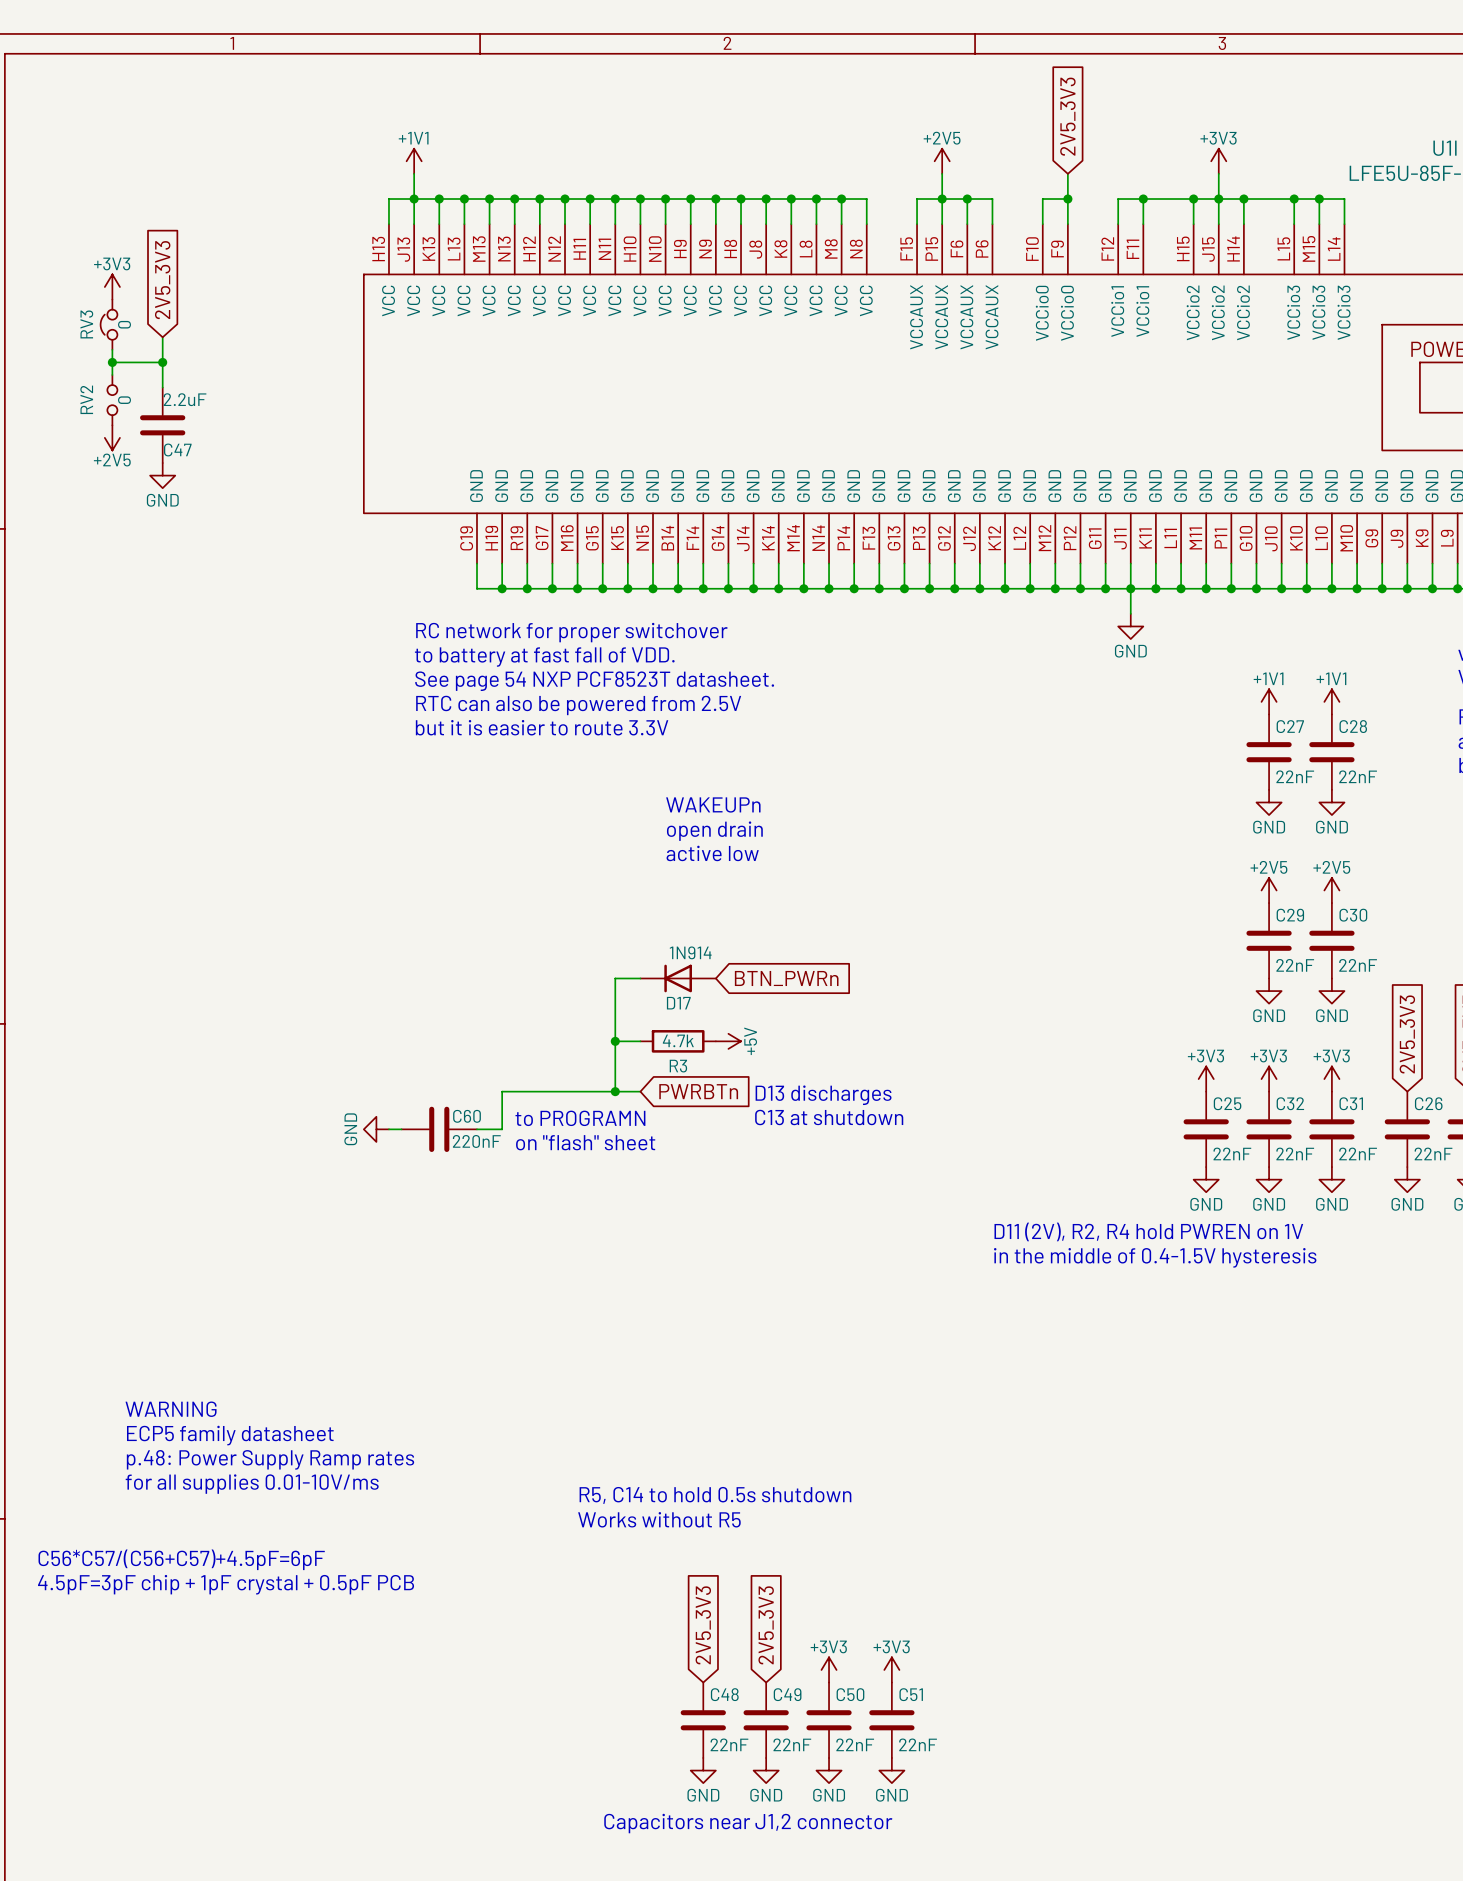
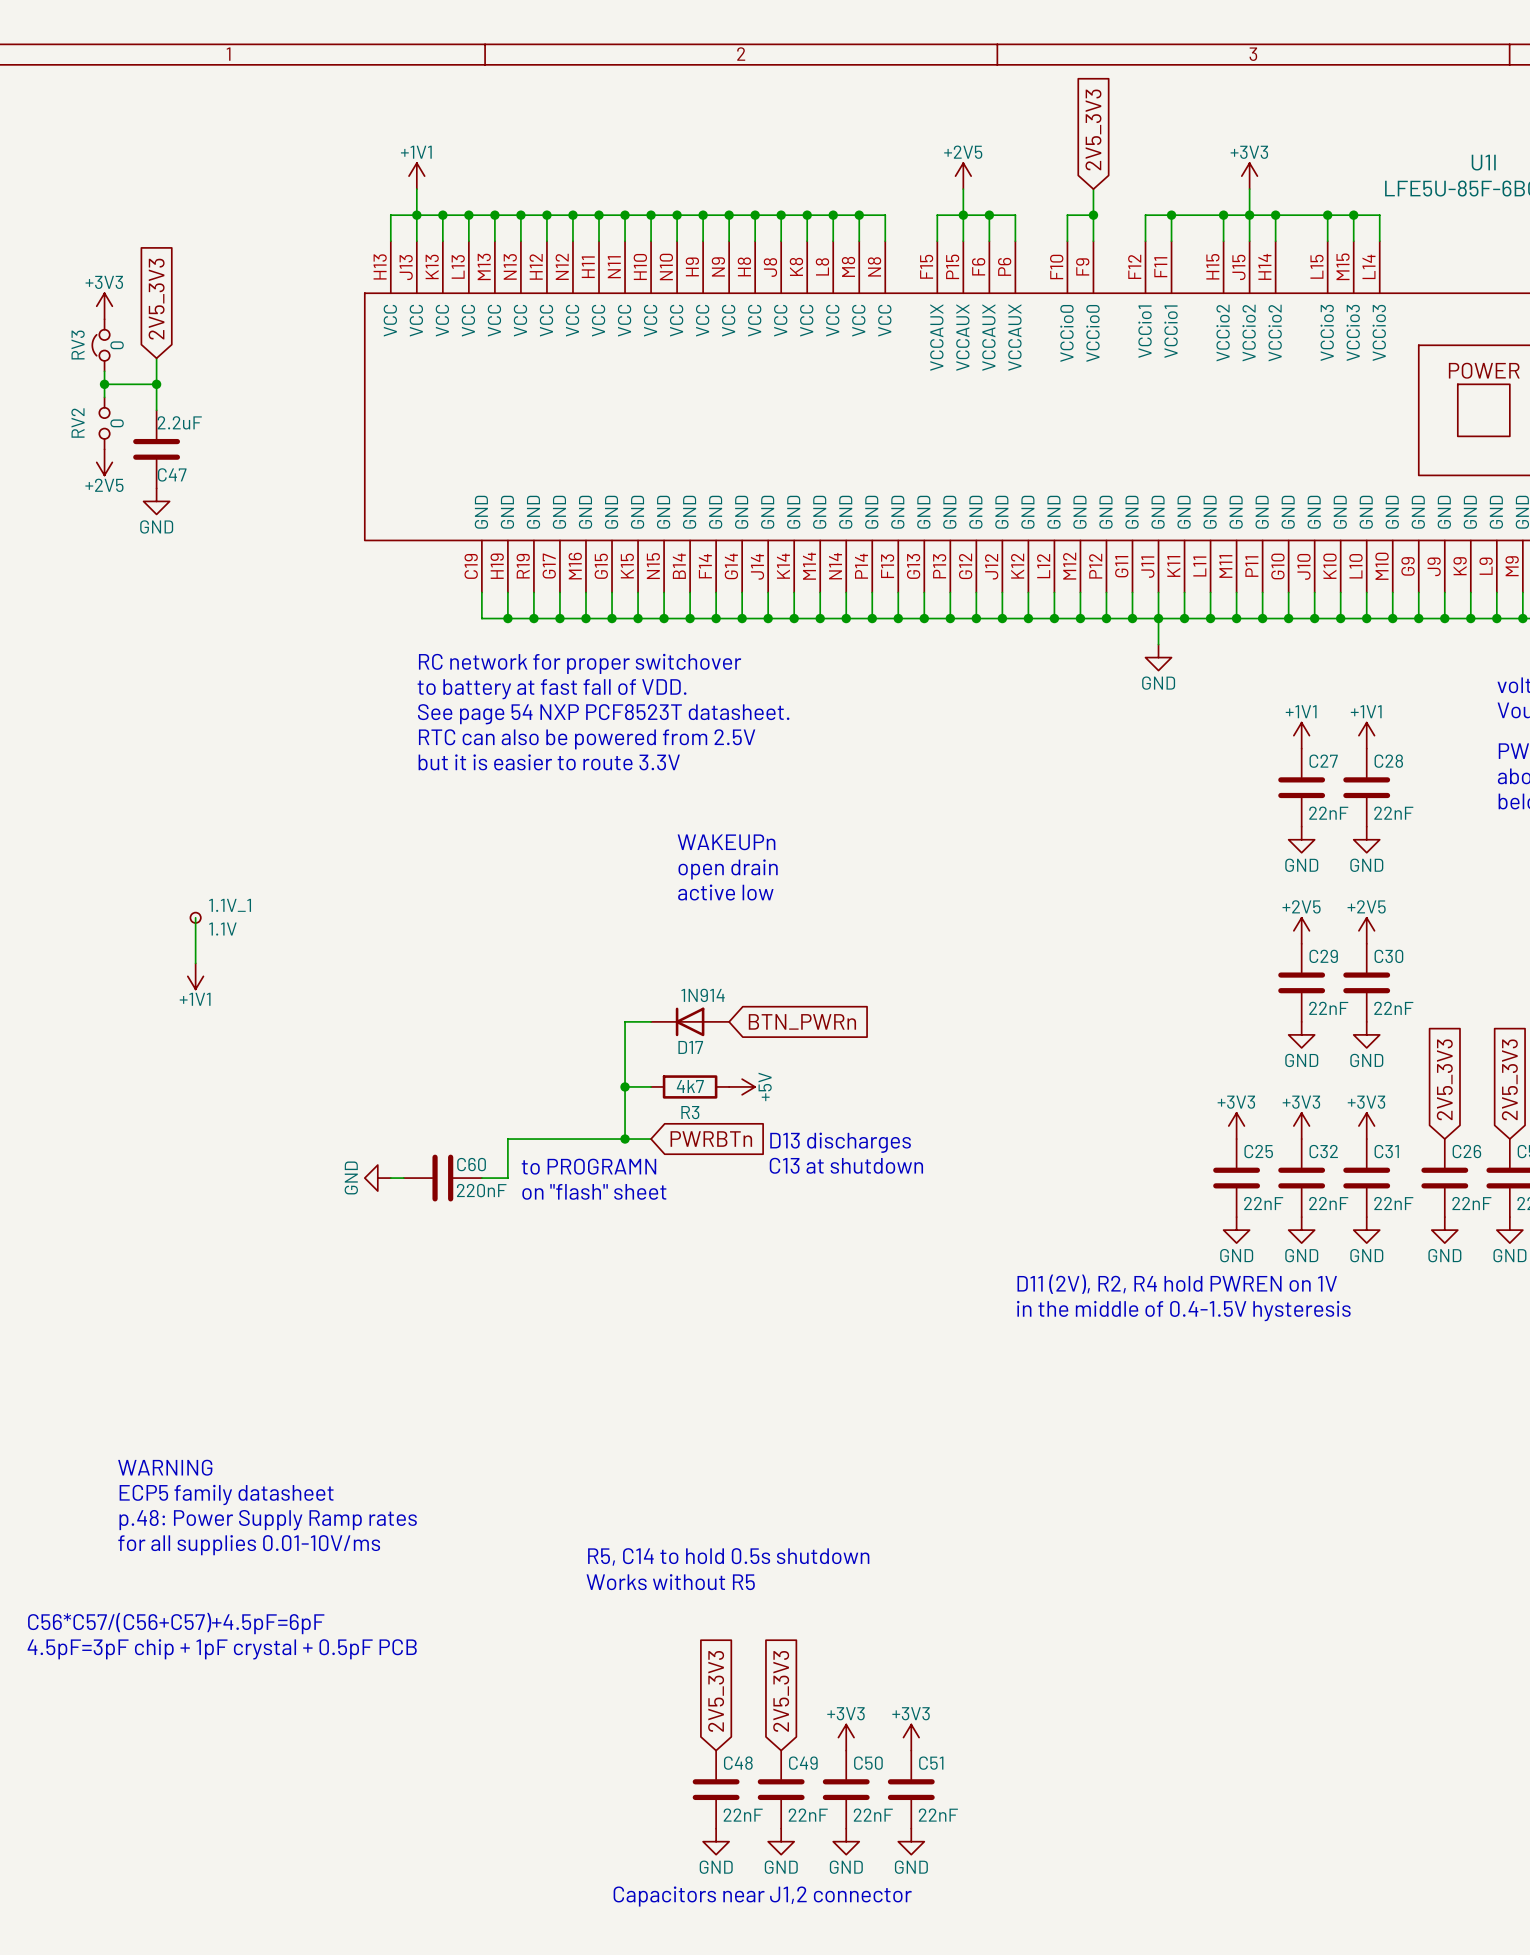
wire: none -> (195, 917) (195, 963)
1.1V_1: none -> 1.1V (195, 917)
power symbol: none -> +1V1 (195, 976)
R3 value: 4.7k (678, 1040) -> 4k7 (690, 1086)

